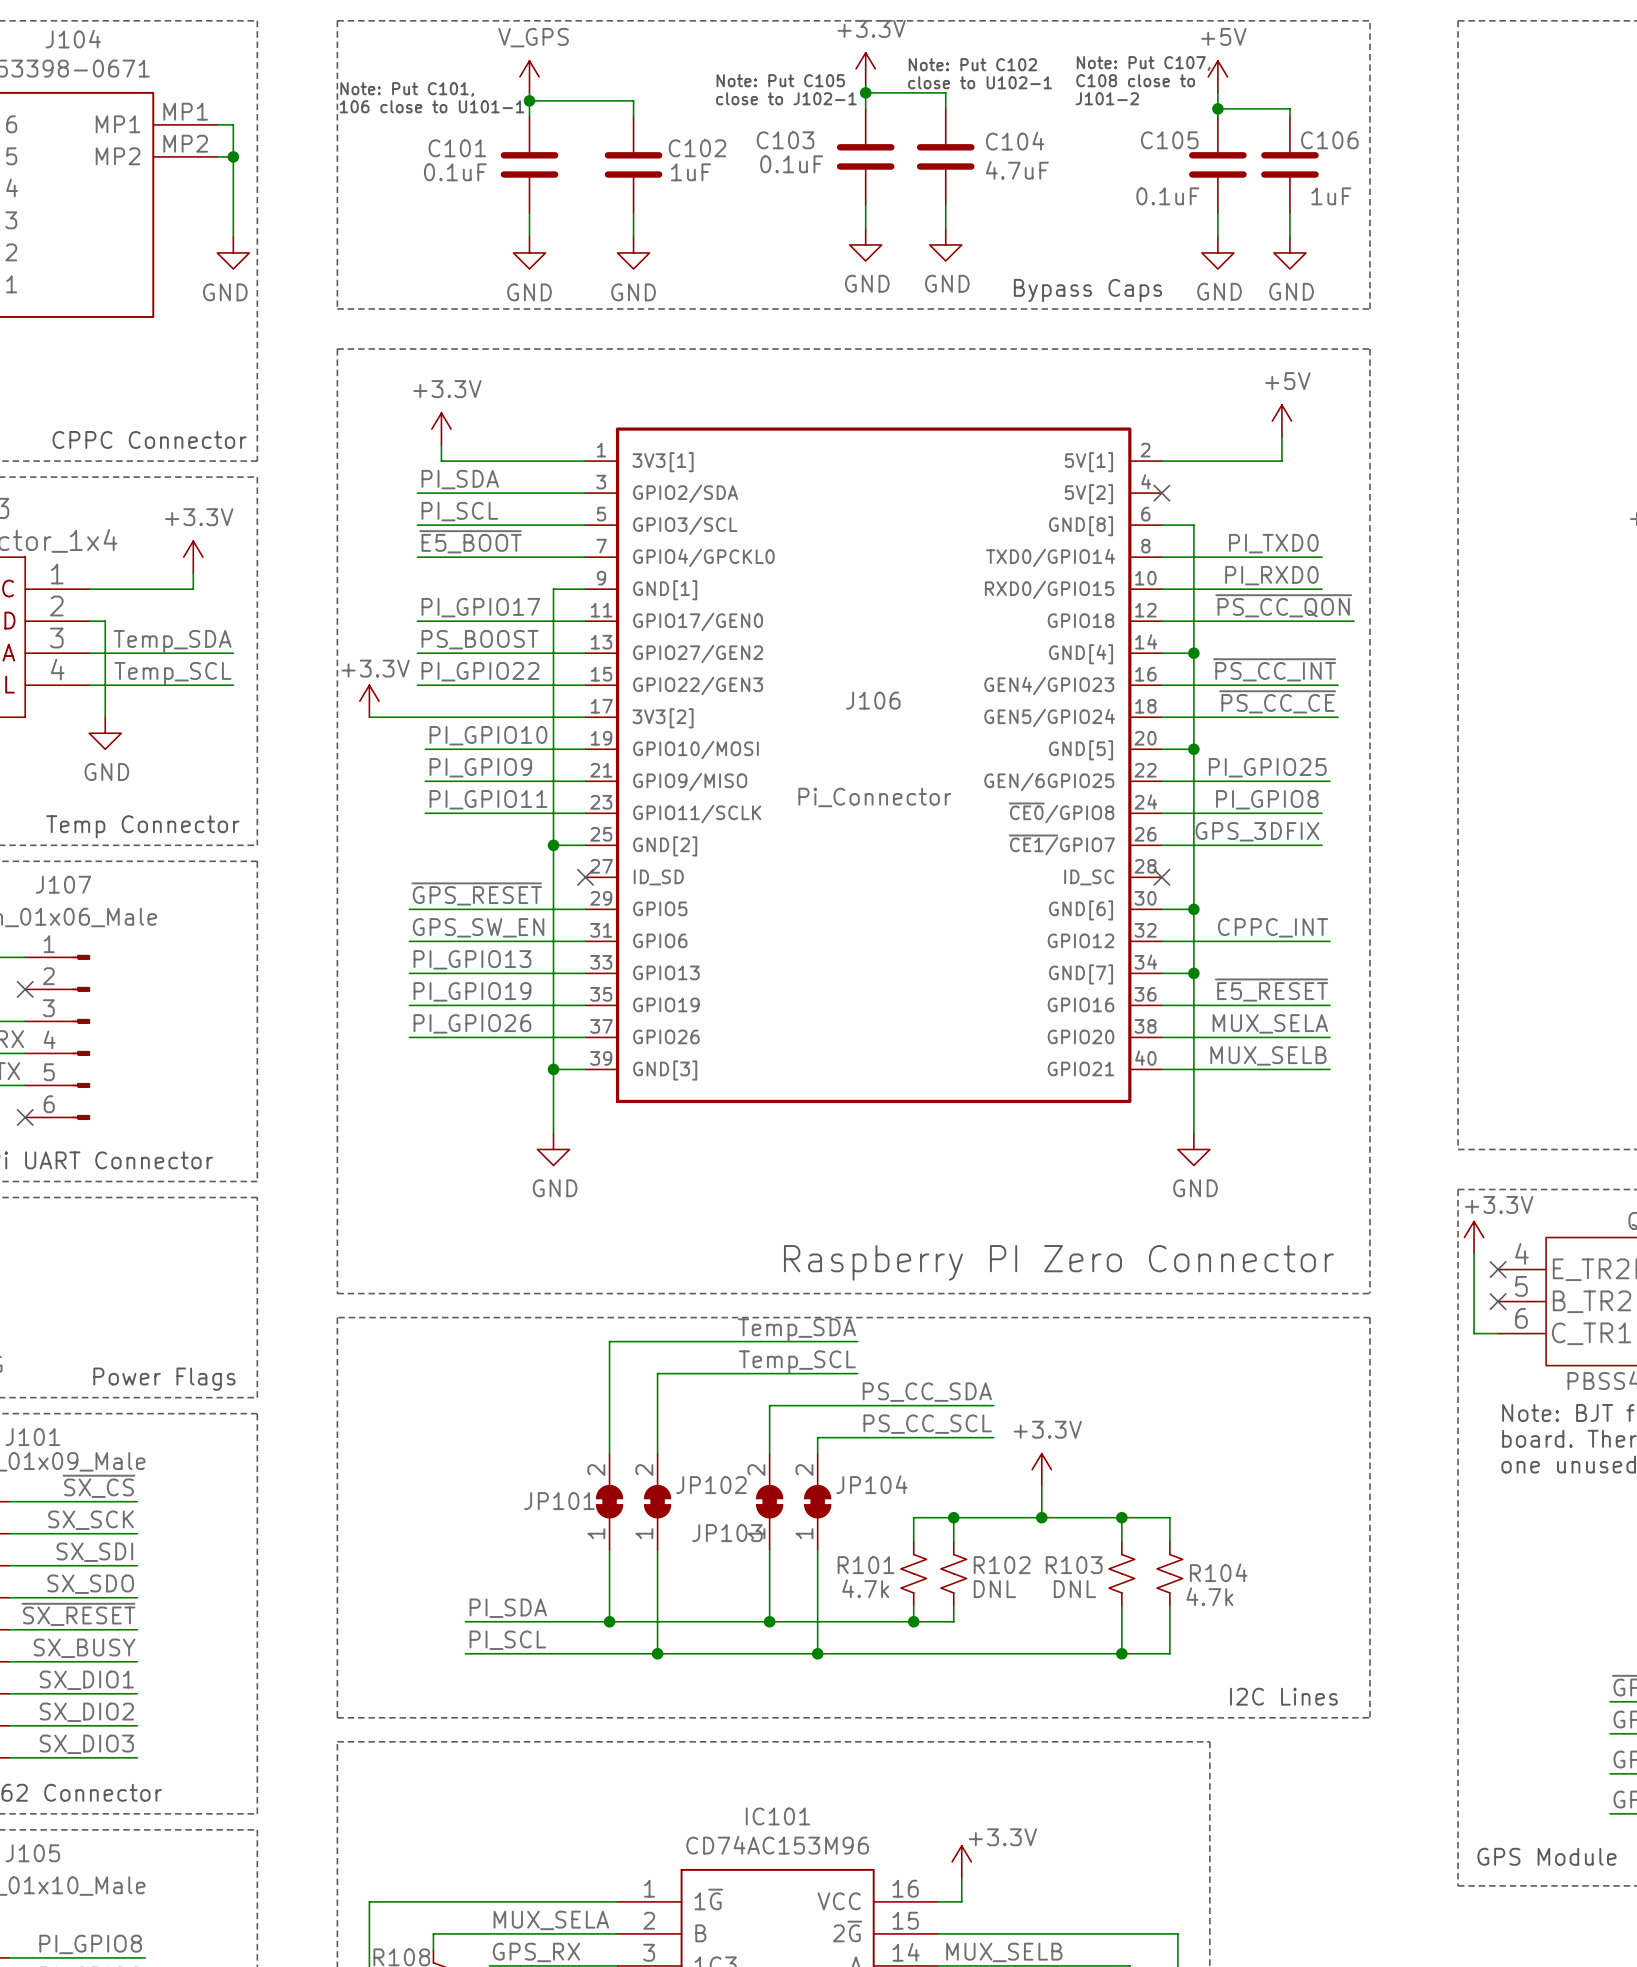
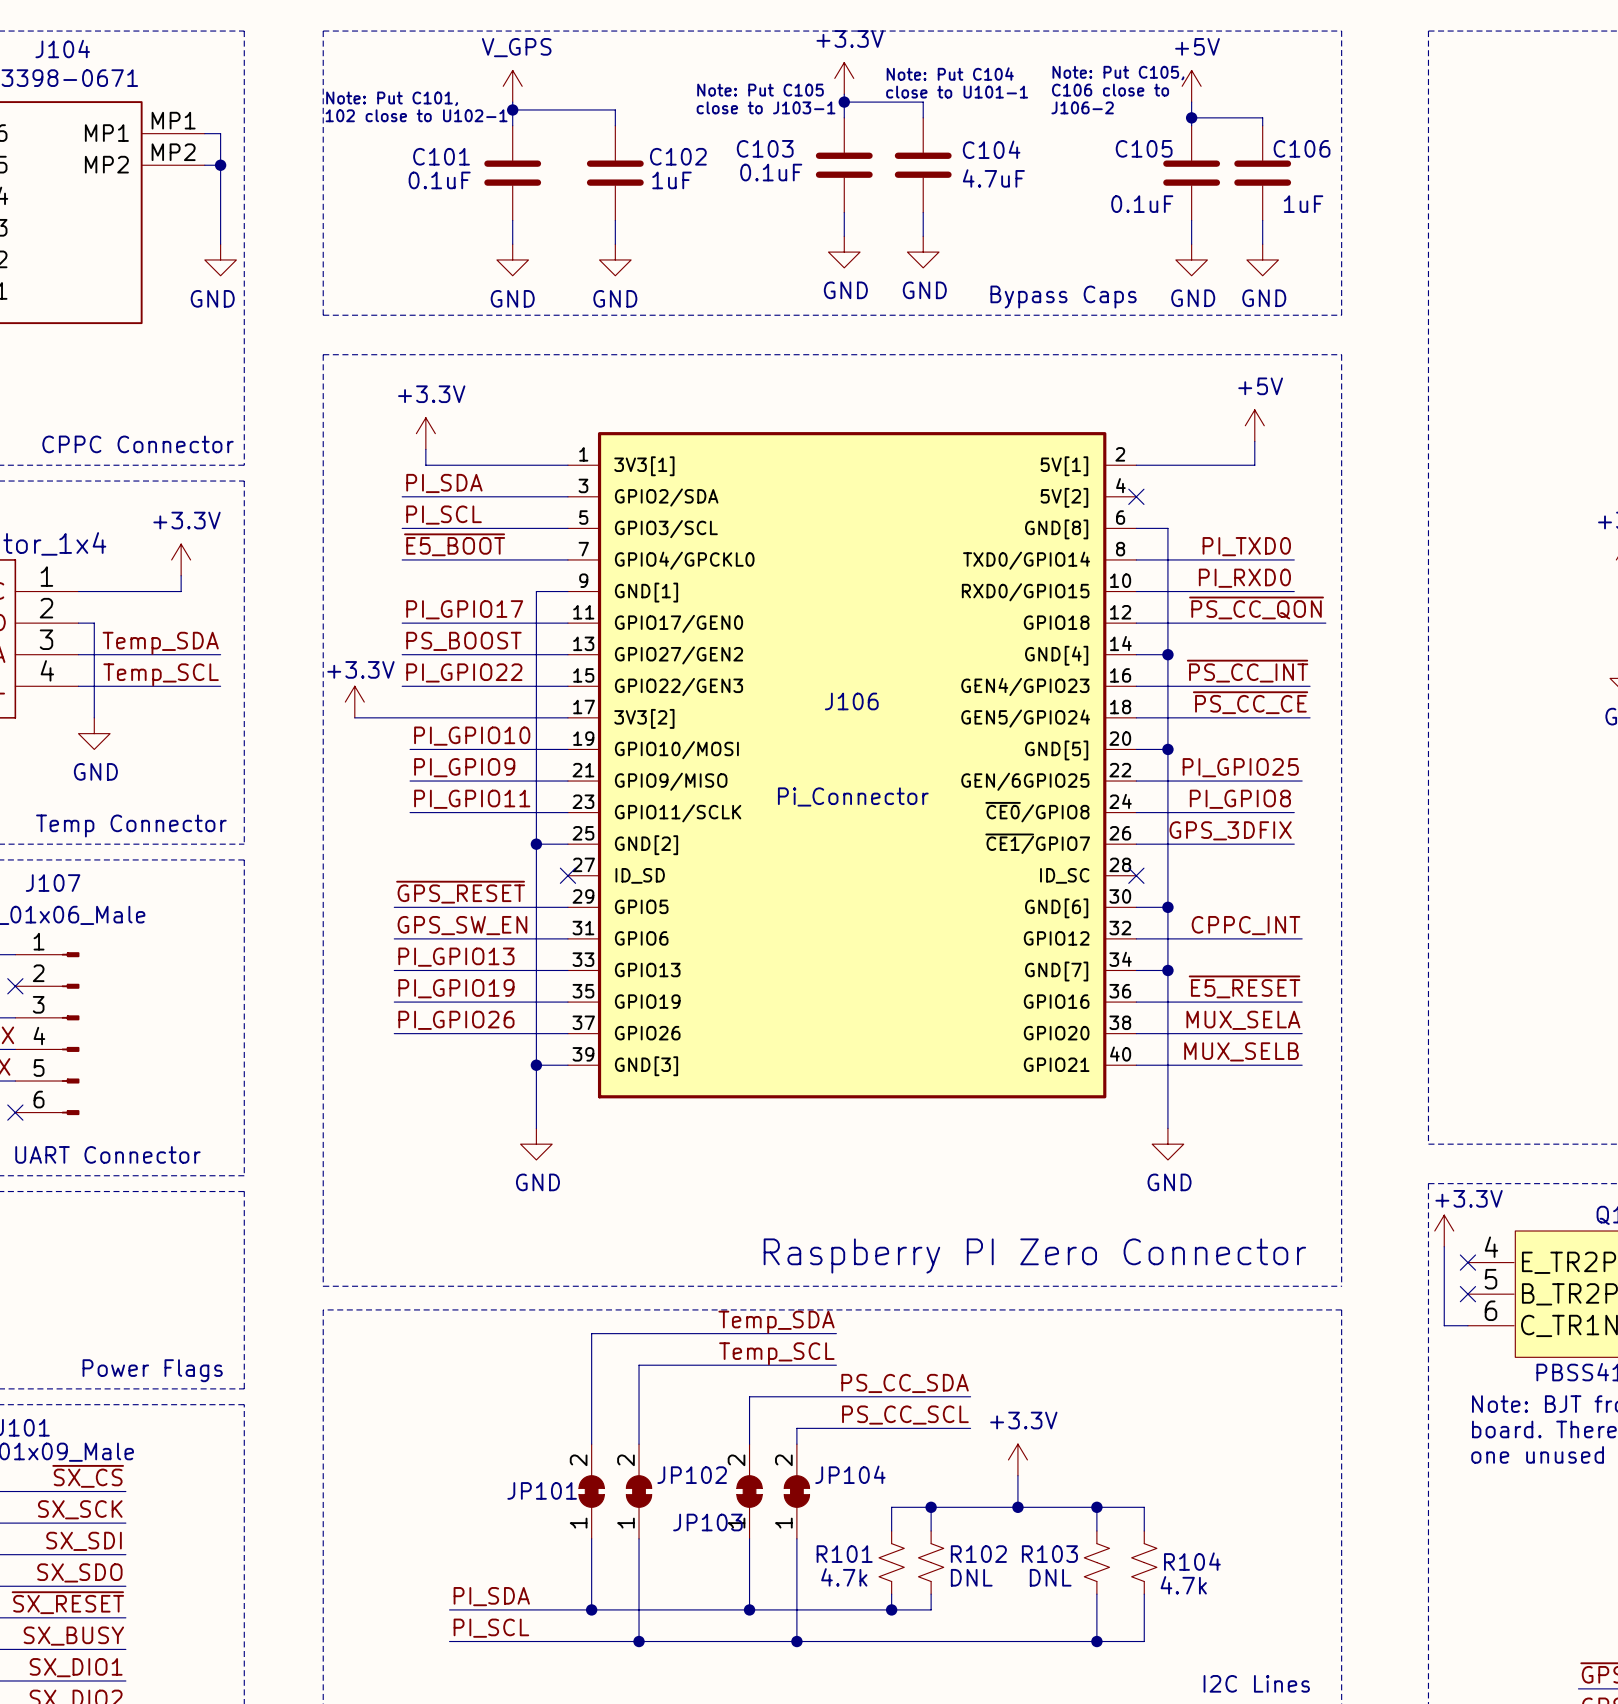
text: Note: Put C107, (1143, 63) -> Note: Put C105, (1118, 73)
text: Note: Put C102 (972, 64) -> Note: Put C104 (950, 74)
text: C108 close to (1135, 80) -> C106 close to (1110, 90)
text: close to U102-1 (980, 82) -> close to U101-1 (957, 92)
text: close to J102-1 (786, 98) -> close to J103-1 (766, 107)
text: J101-2 (1107, 98) -> J106-2 (1082, 107)
text: 106 close to U101-1 (432, 106) -> 102 close to U102-1 (416, 115)

